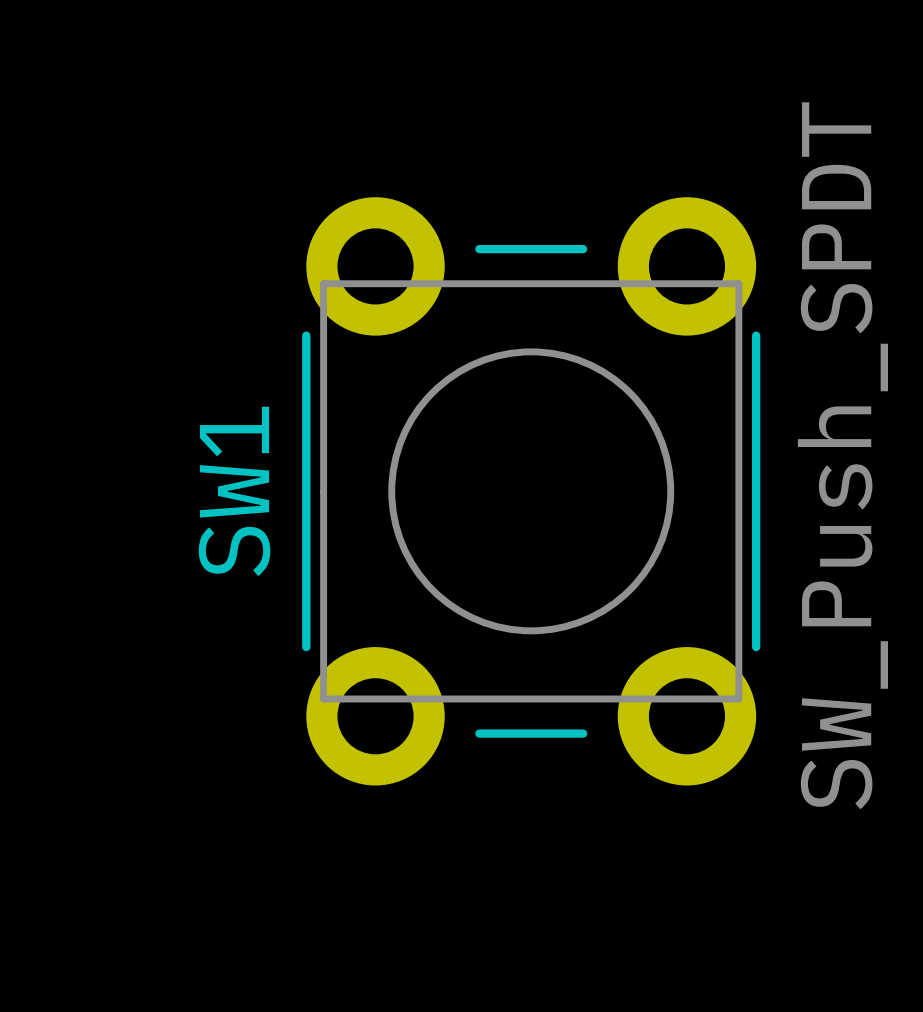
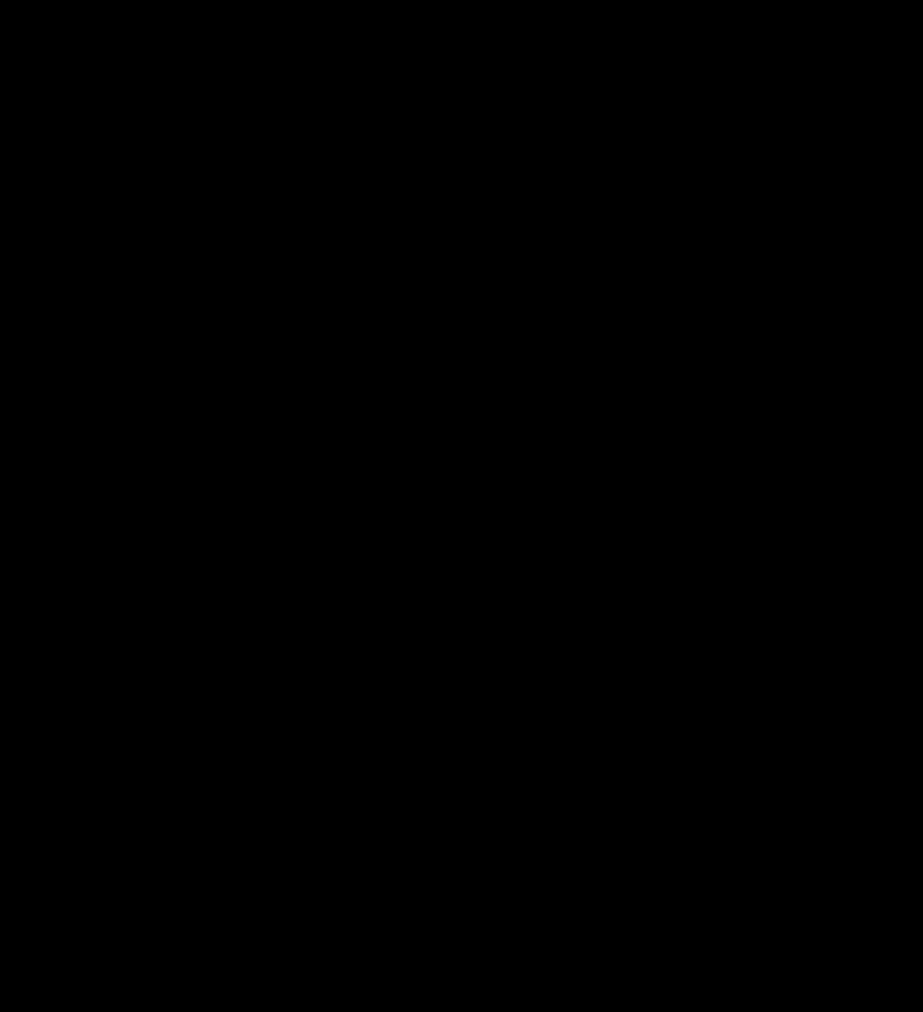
SW1: SW_Push_SPDT (531, 491) -> none

